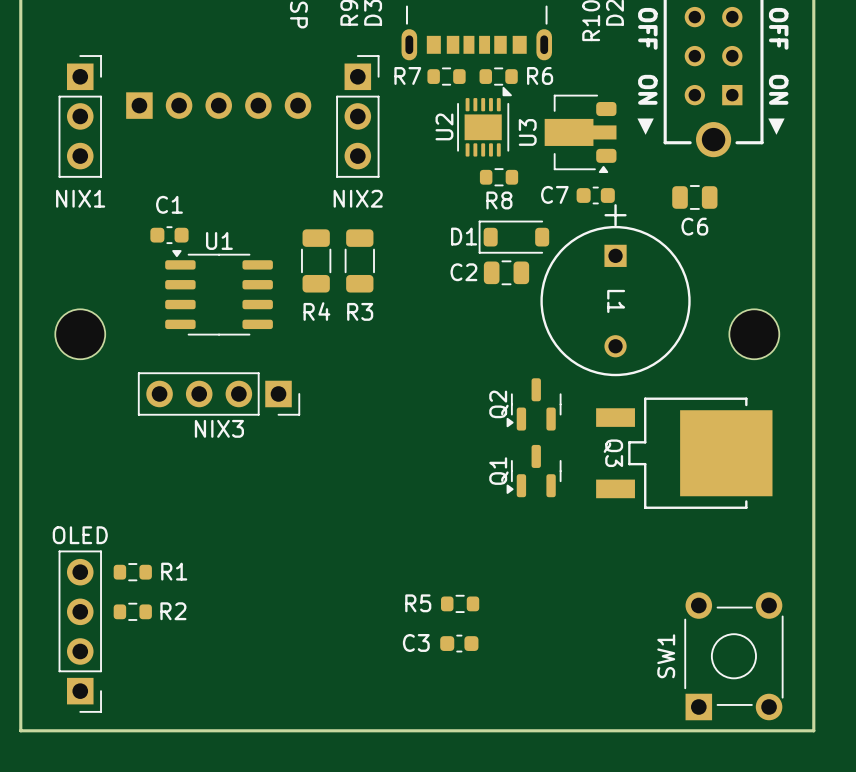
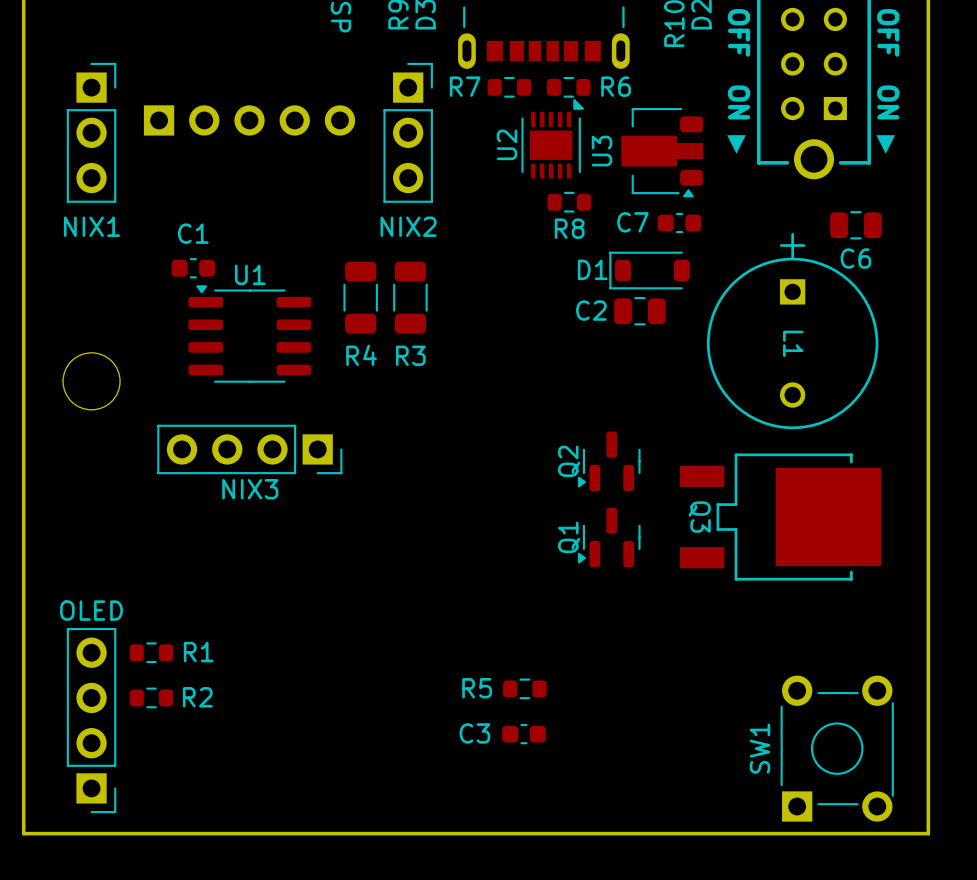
C6 position: (694, 197) -> (855, 225)
D1 position: (513, 237) -> (649, 270)
C2 position: (506, 272) -> (639, 311)
L1 position: (615, 290) -> (792, 330)
part: (754, 334) -> none

